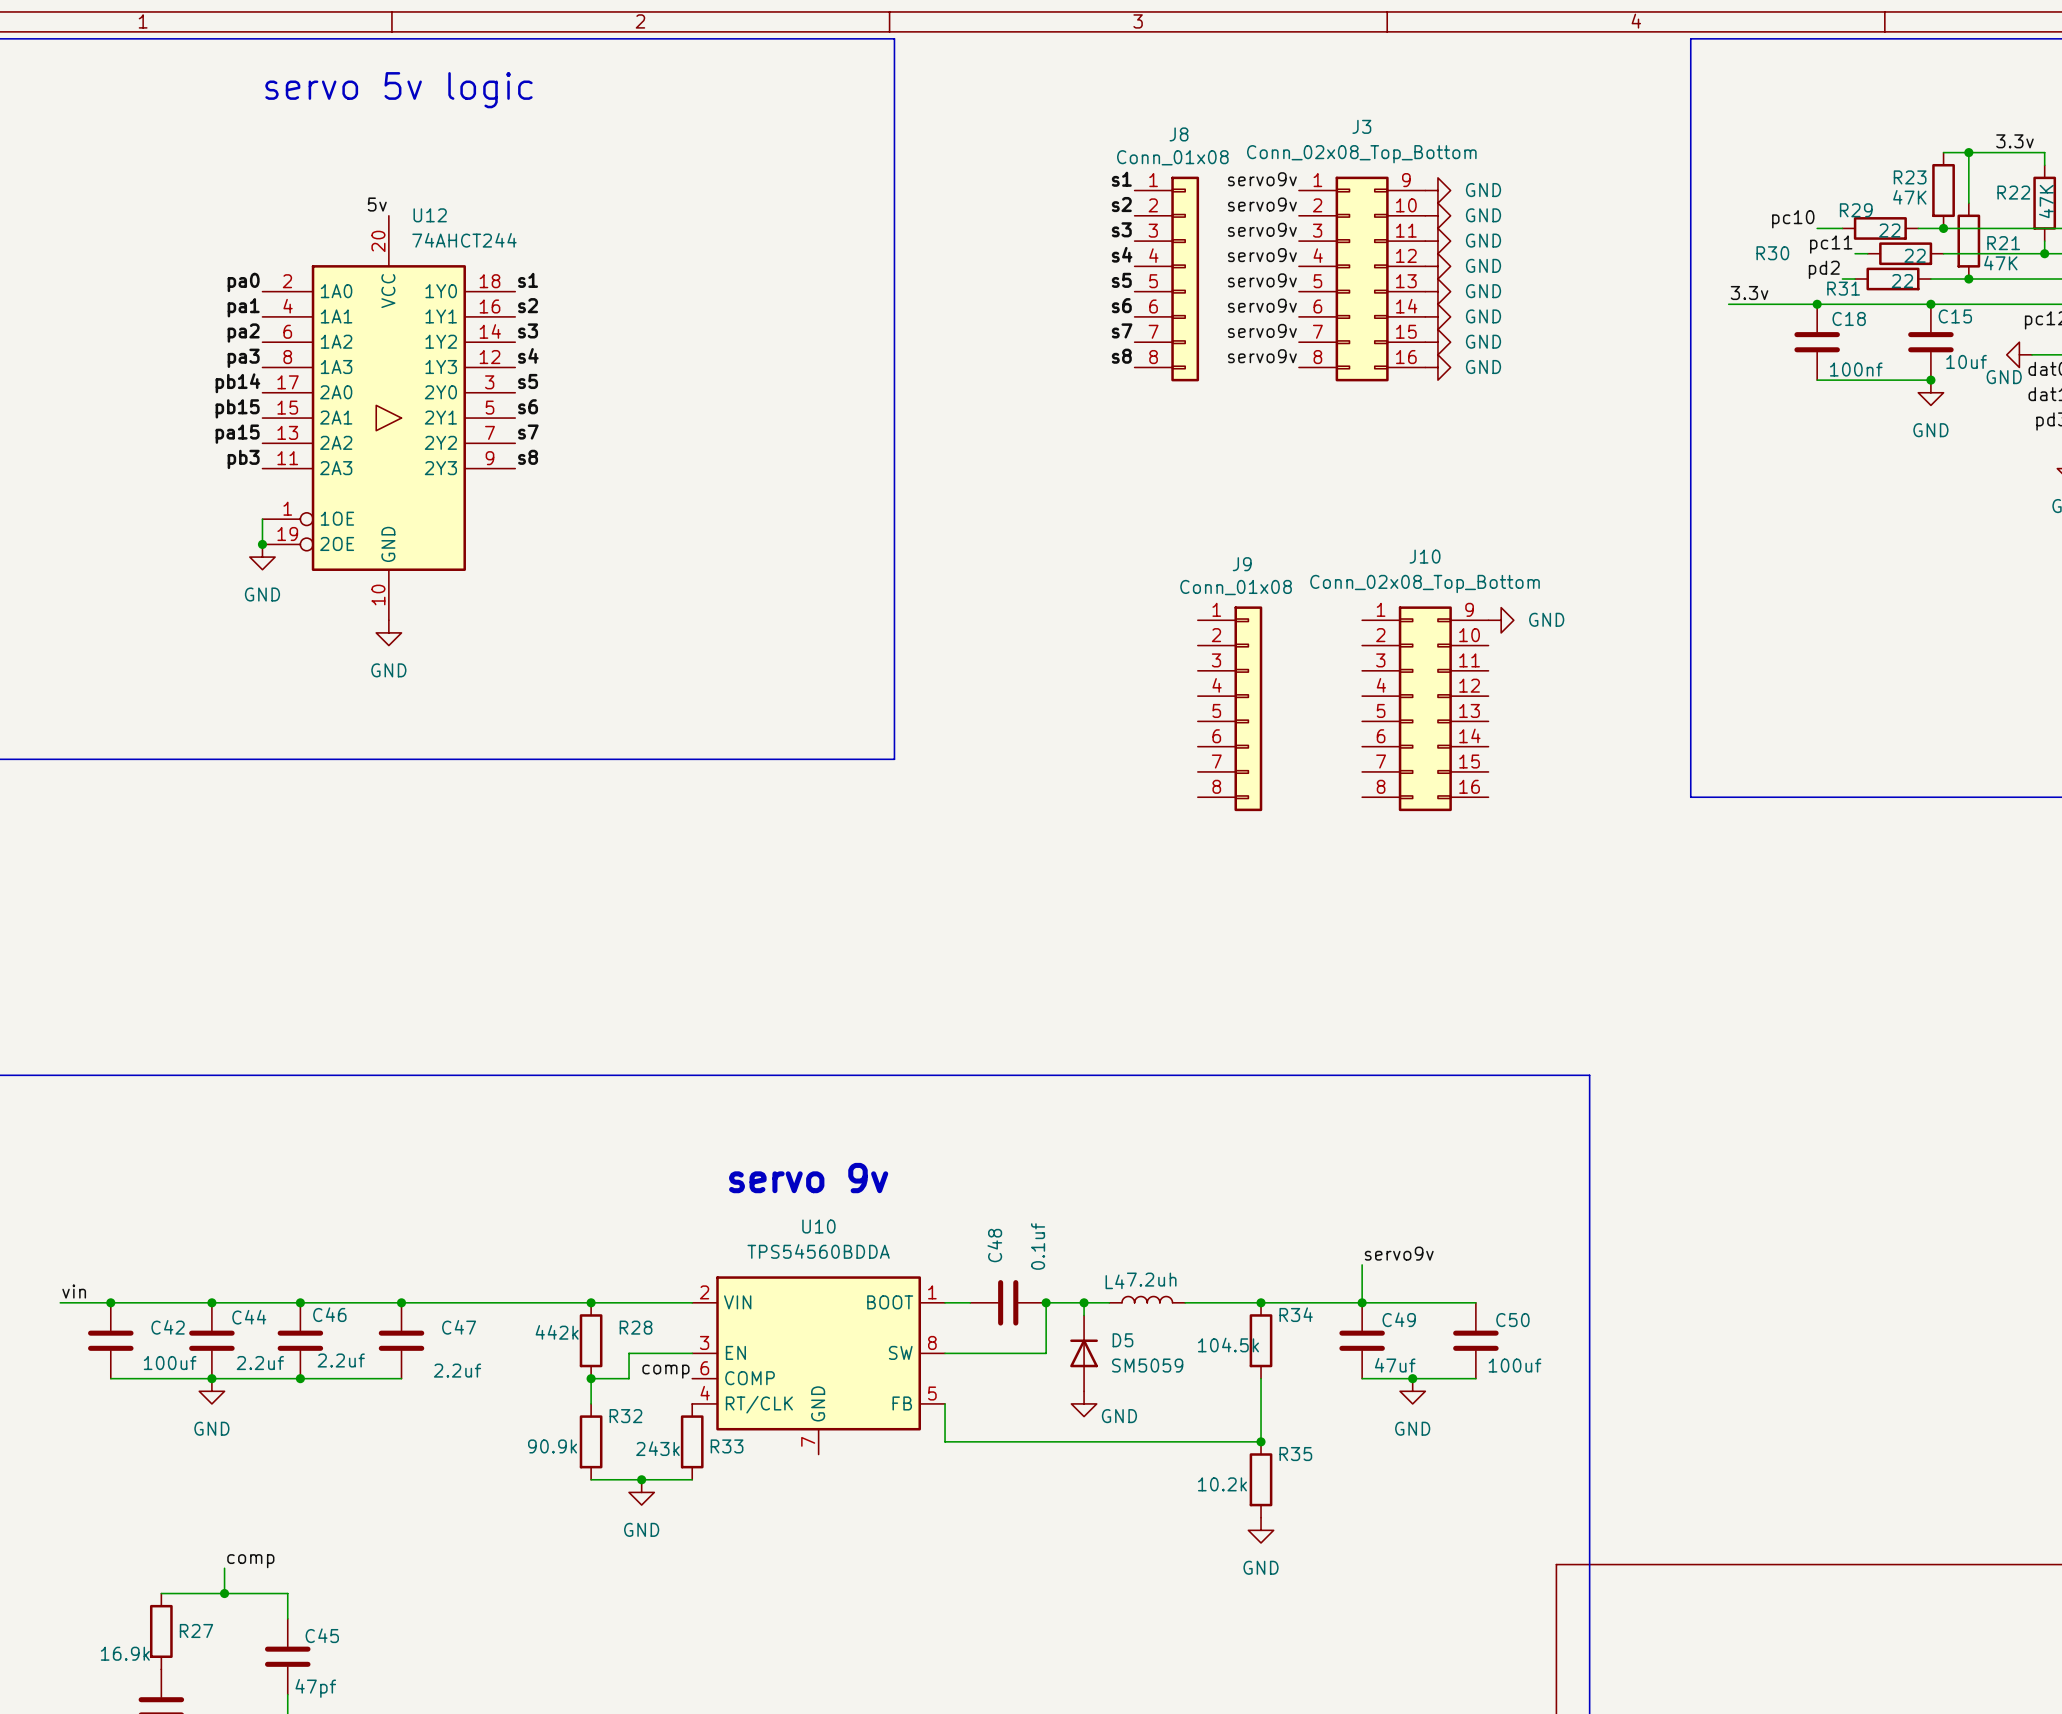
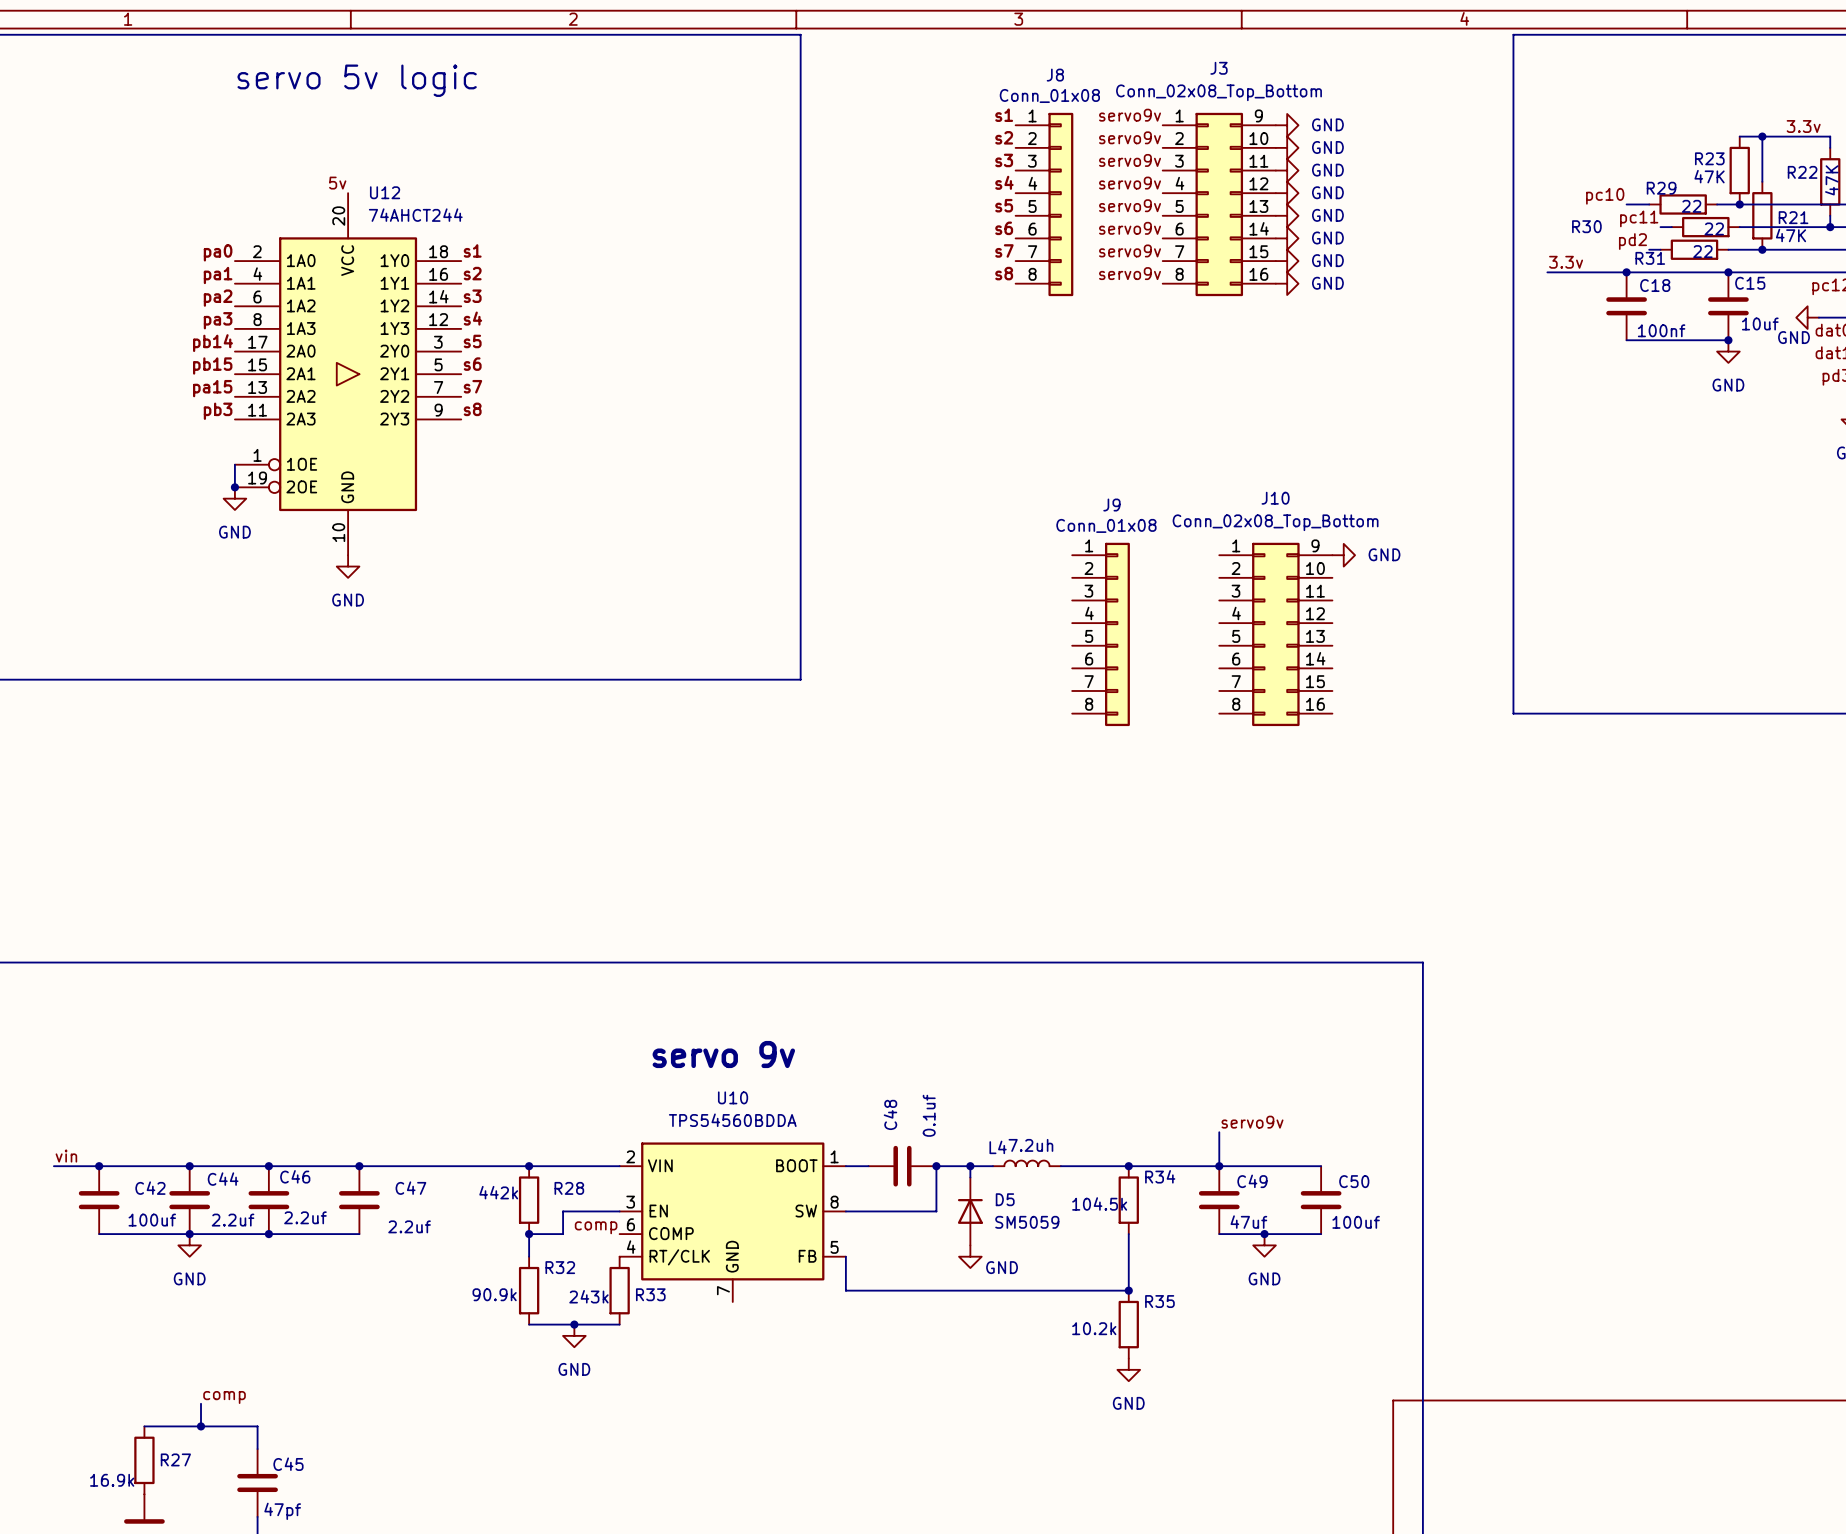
label: none -> s1 (1004, 115)
label: none -> servo9v (1130, 115)
power symbol: none -> GND (1287, 125)
label: none -> s2 (1004, 137)
label: none -> servo9v (1130, 137)
power symbol: none -> GND (1287, 147)
label: s1 (1121, 179) -> s3 (1004, 160)
label: s2 (1121, 204) -> s4 (1004, 182)
label: s3 (1121, 229) -> s5 (1004, 205)
label: s4 (1122, 254) -> s6 (1004, 228)
J8 position: (1166, 279) -> (1044, 204)
J3 position: (1362, 279) -> (1219, 204)
label: s5 (1121, 280) -> s7 (1004, 250)
label: s6 (1121, 305) -> s8 (1004, 273)
label: s7 (1122, 330) -> none
label: servo9v (1262, 330) -> none
power symbol: GND (1437, 342) -> none
label: s8 (1121, 356) -> none
label: servo9v (1262, 356) -> none
power symbol: GND (1437, 367) -> none

